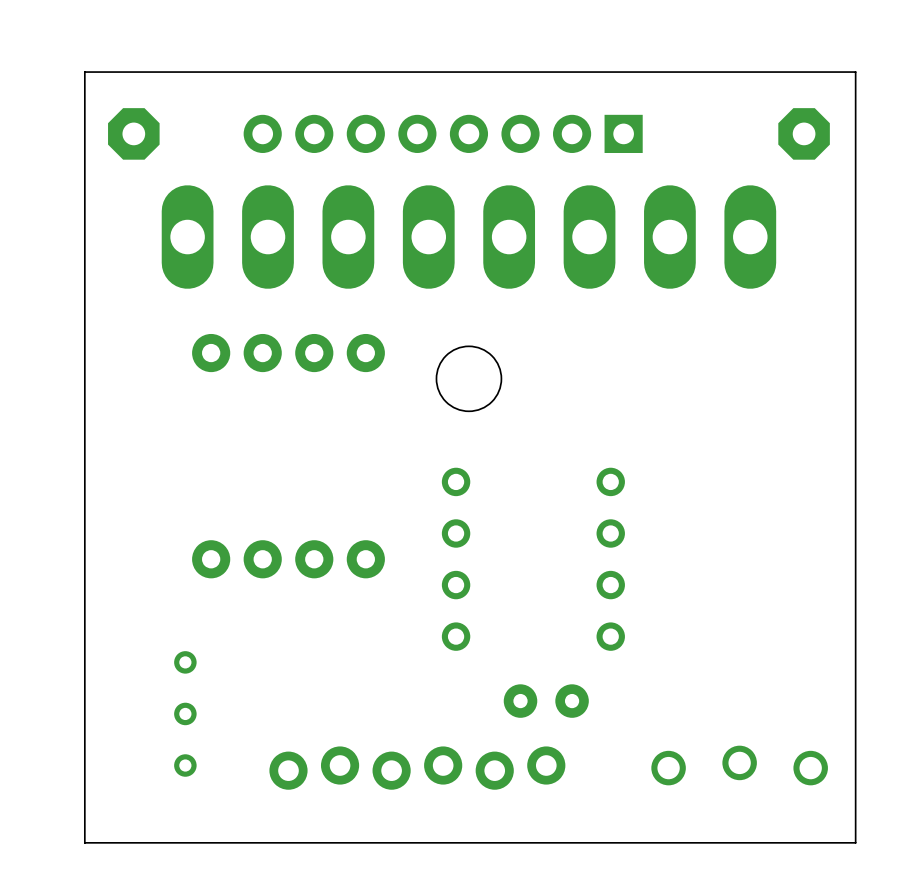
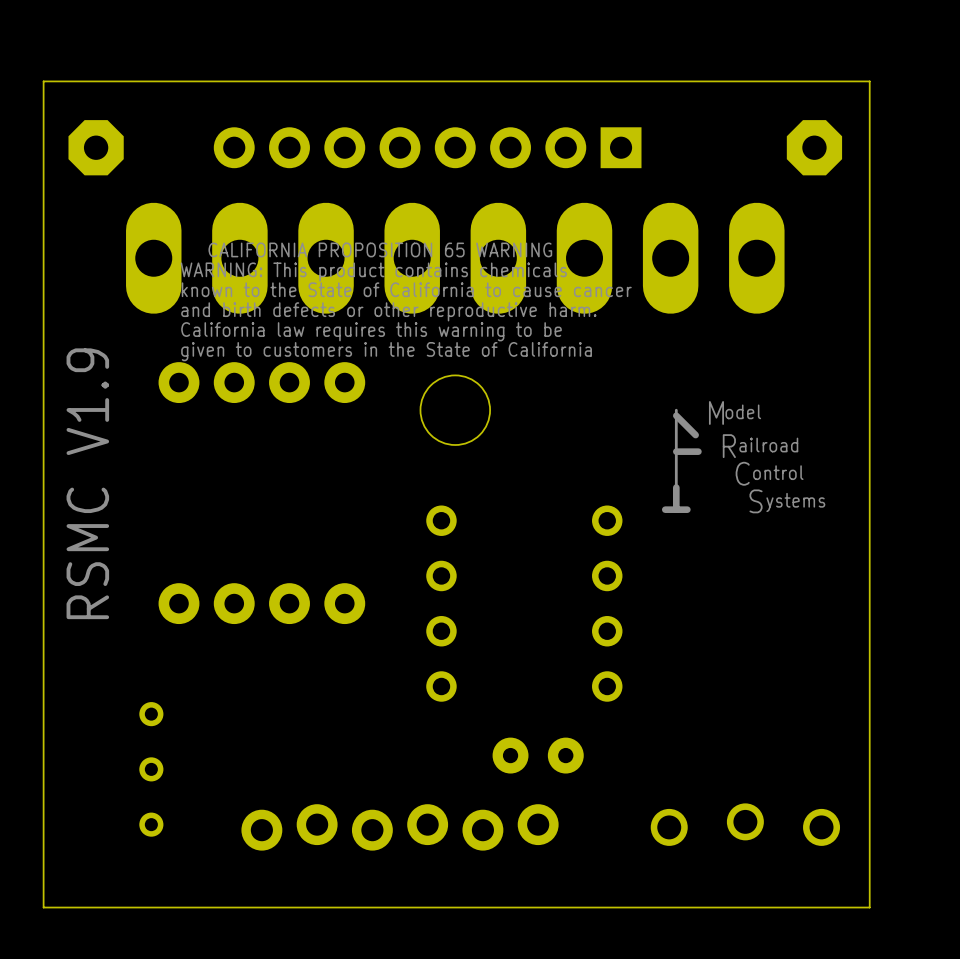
drawing: none -> [180, 242, 632, 362]
drawing: none -> [661, 408, 702, 513]
text: none -> RSMC V1.9 (87, 483)

